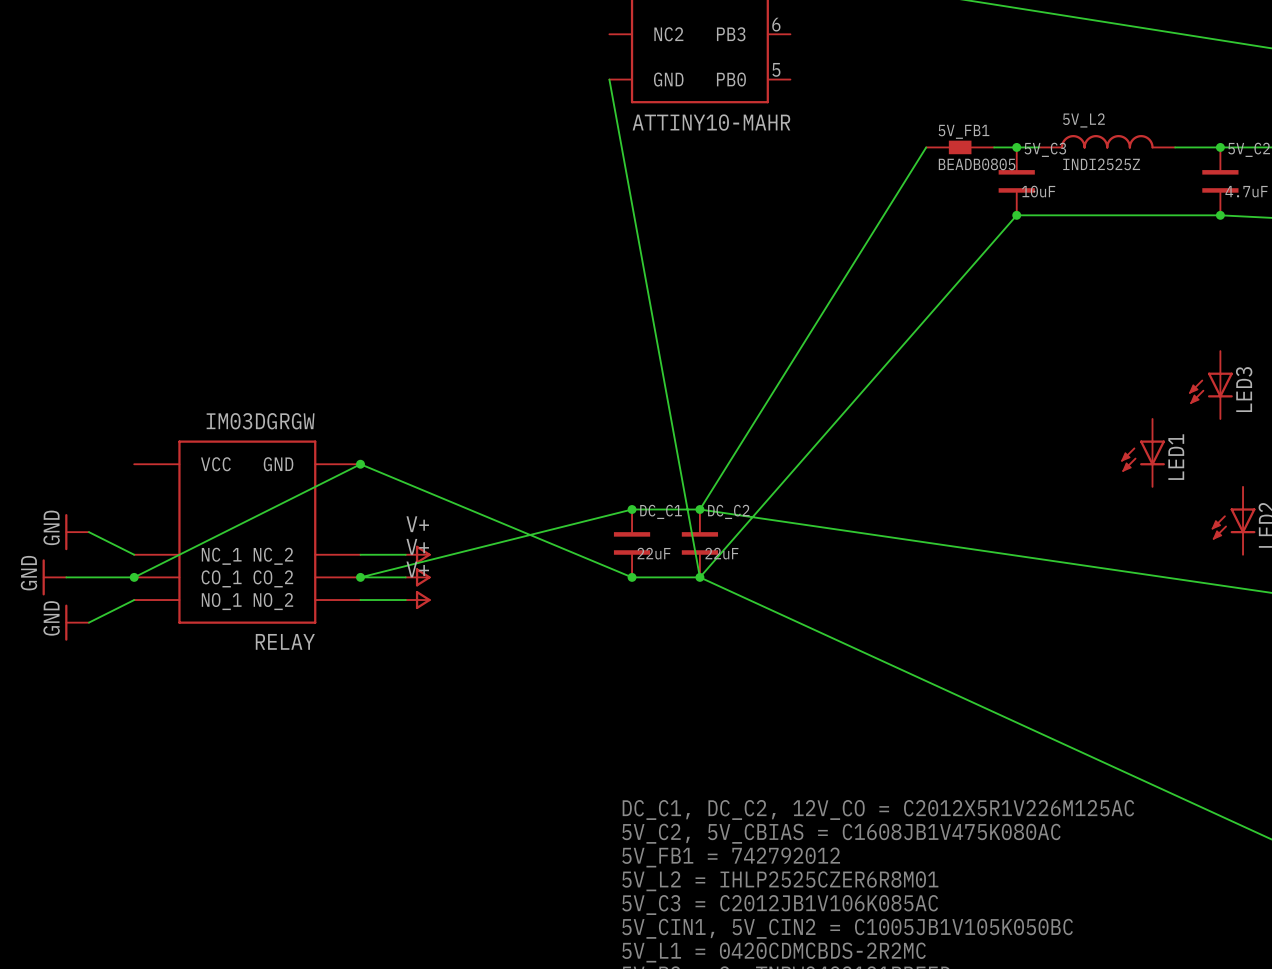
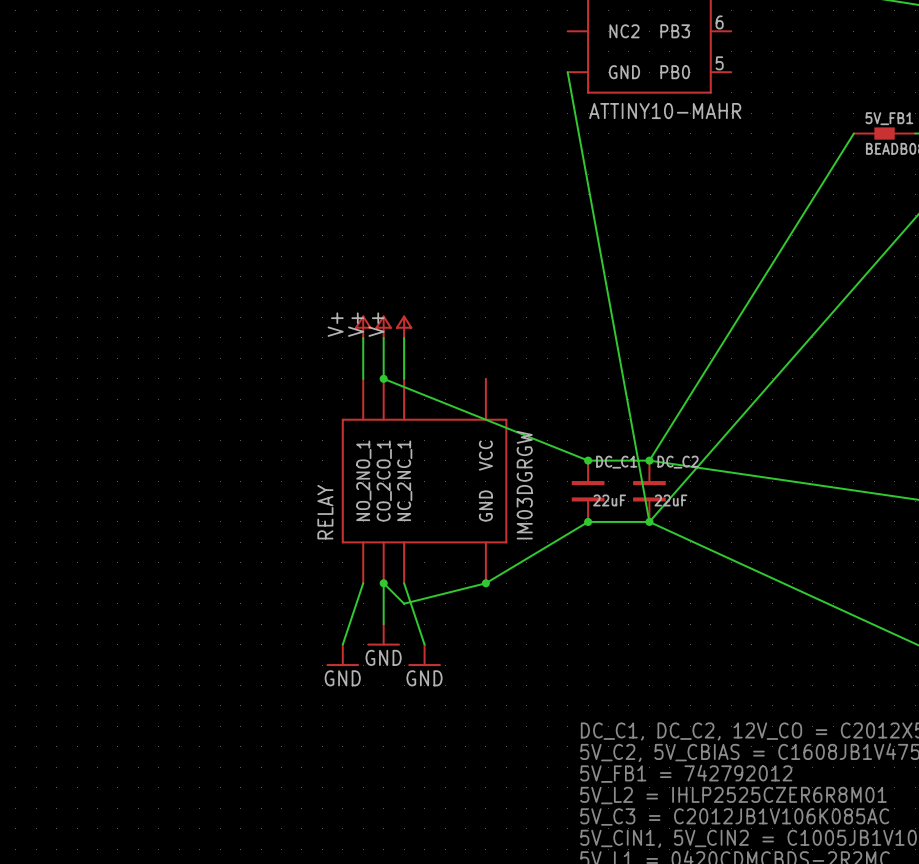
power symbol: none -> V+ (363, 326)
power symbol: none -> V+ (383, 326)
power symbol: none -> V+ (404, 326)
wire: none -> (363, 337) (363, 378)
wire: none -> (404, 337) (404, 378)
junction: none -> (383, 378)
junction: (360, 464) -> none
wire: (632, 509) (360, 577) (405, 577) -> (588, 460) (383, 378) (383, 337)
power symbol: GND (77, 532) -> none
wire: (88, 532) (134, 554) -> none
RELAY rotation: 0° (247, 532) -> 90° clockwise (424, 481)
RELAY position: (247, 532) -> (424, 481)
wire: (360, 554) (405, 554) -> none
power symbol: V+ (418, 554) -> none
power symbol: GND (54, 577) -> none
wire: (66, 577) (134, 577) (360, 464) (632, 577) -> (383, 624) (383, 583) (404, 603) (485, 583) (588, 521)
junction: (134, 577) -> none
junction: (360, 577) -> none
power symbol: V+ (418, 577) -> none
wire: (134, 600) (88, 622) -> none
power symbol: V+ (418, 600) -> none
power symbol: GND (77, 622) -> none
wire: none -> (363, 583) (342, 644)
junction: none -> (383, 583)
wire: none -> (404, 583) (424, 644)
junction: none -> (485, 583)
power symbol: none -> GND (383, 634)
power symbol: none -> GND (342, 655)
power symbol: none -> GND (424, 655)

